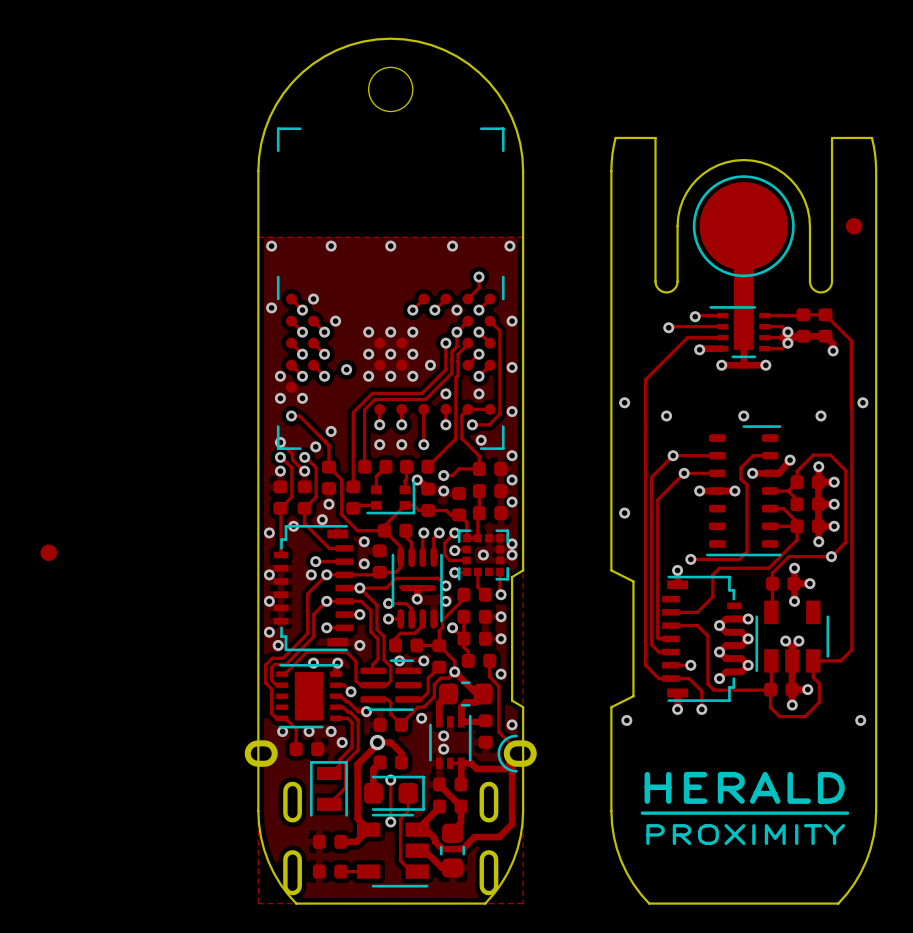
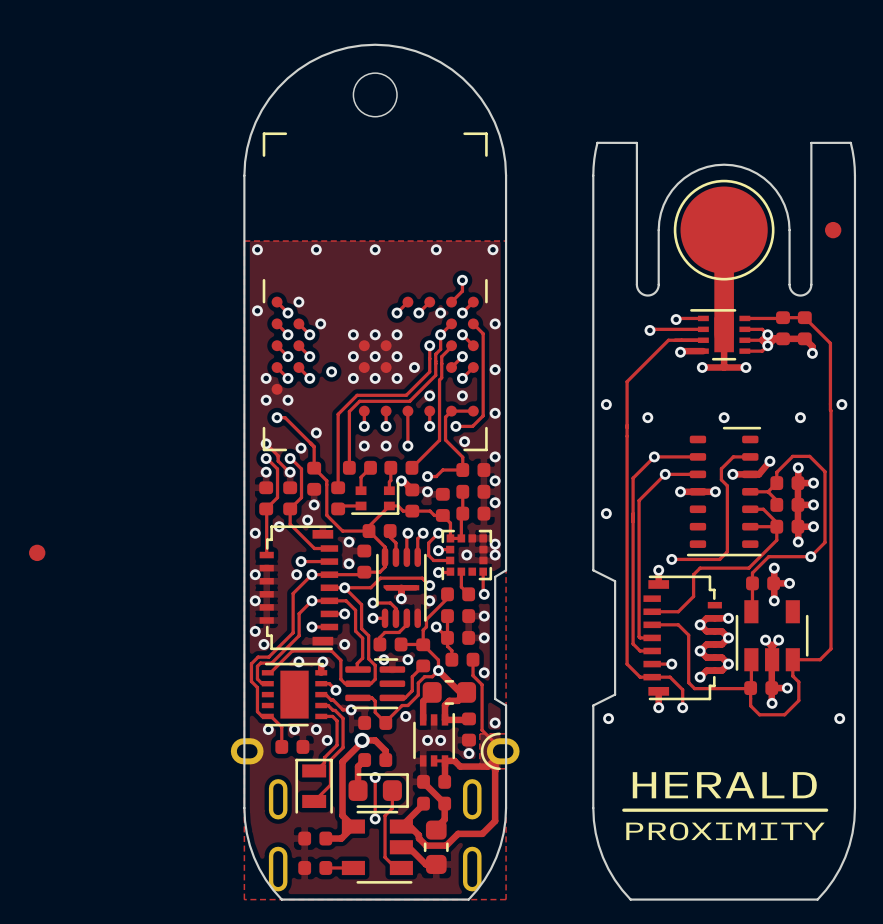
via: (443, 735) -> none
zone outline: none -> (506, 733) (479, 733) (479, 768) (506, 768)
via: none -> (427, 740)
via: none -> (440, 740)
via: (443, 749) -> none
via: none -> (468, 753)

